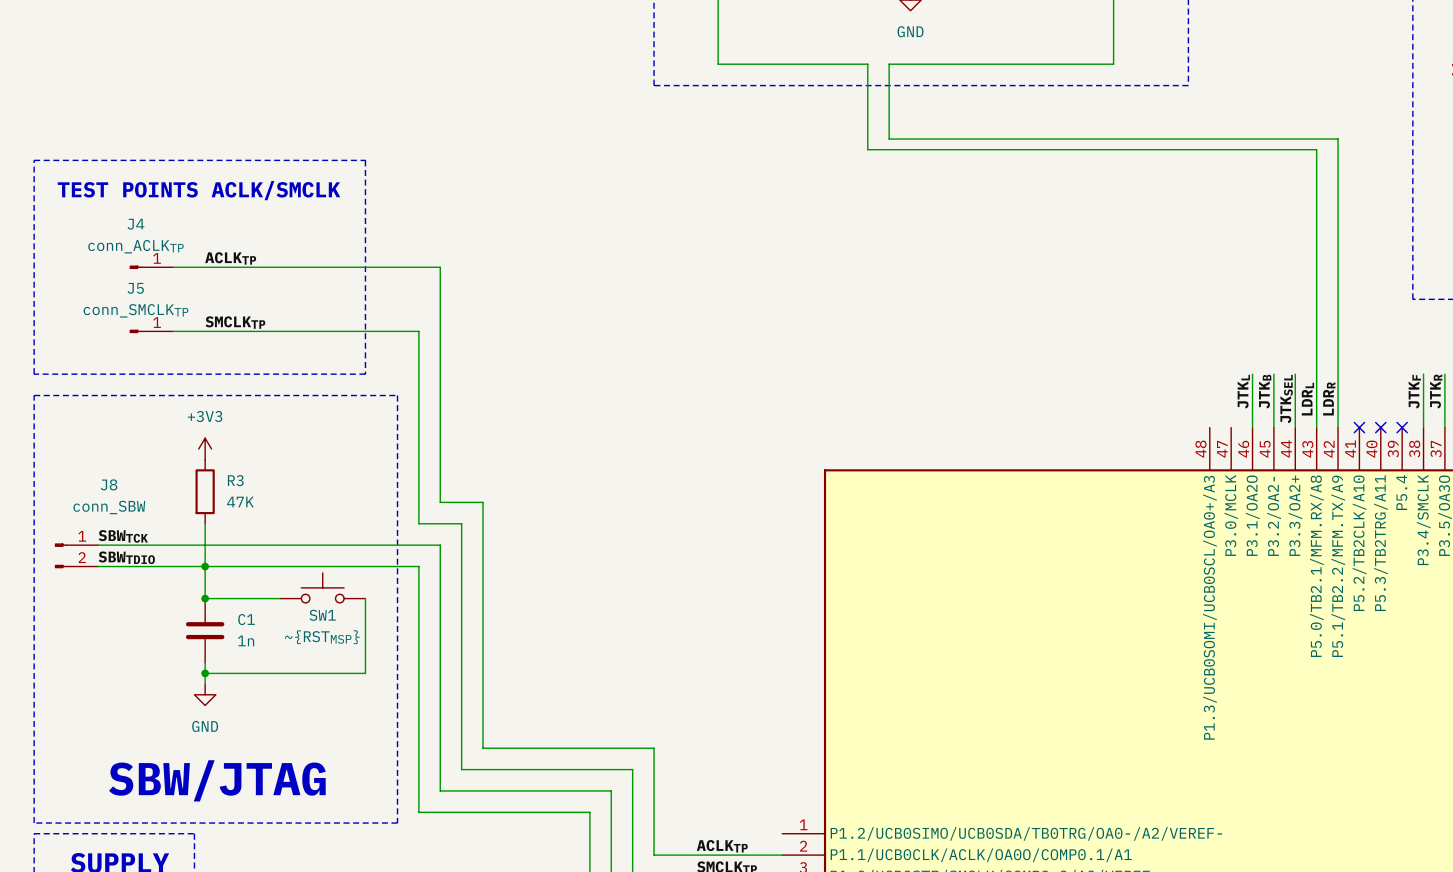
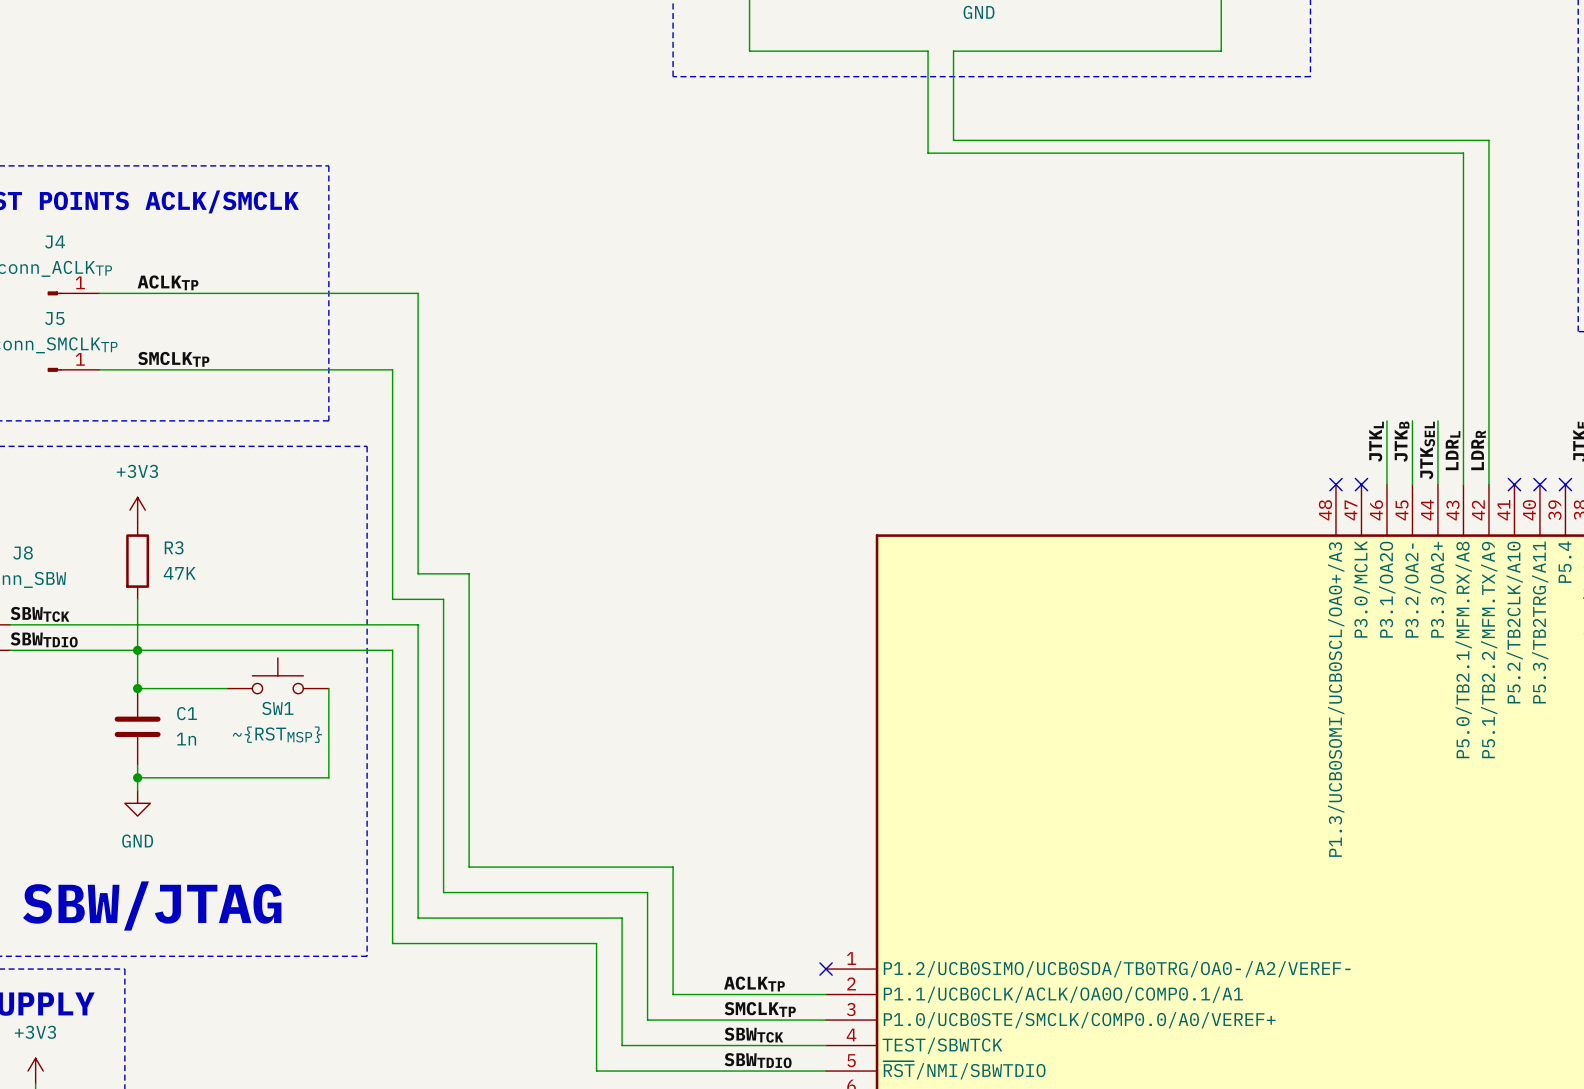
no-connect mark: none -> (1335, 484)
no-connect mark: none -> (1361, 484)
no-connect mark: none -> (826, 969)

